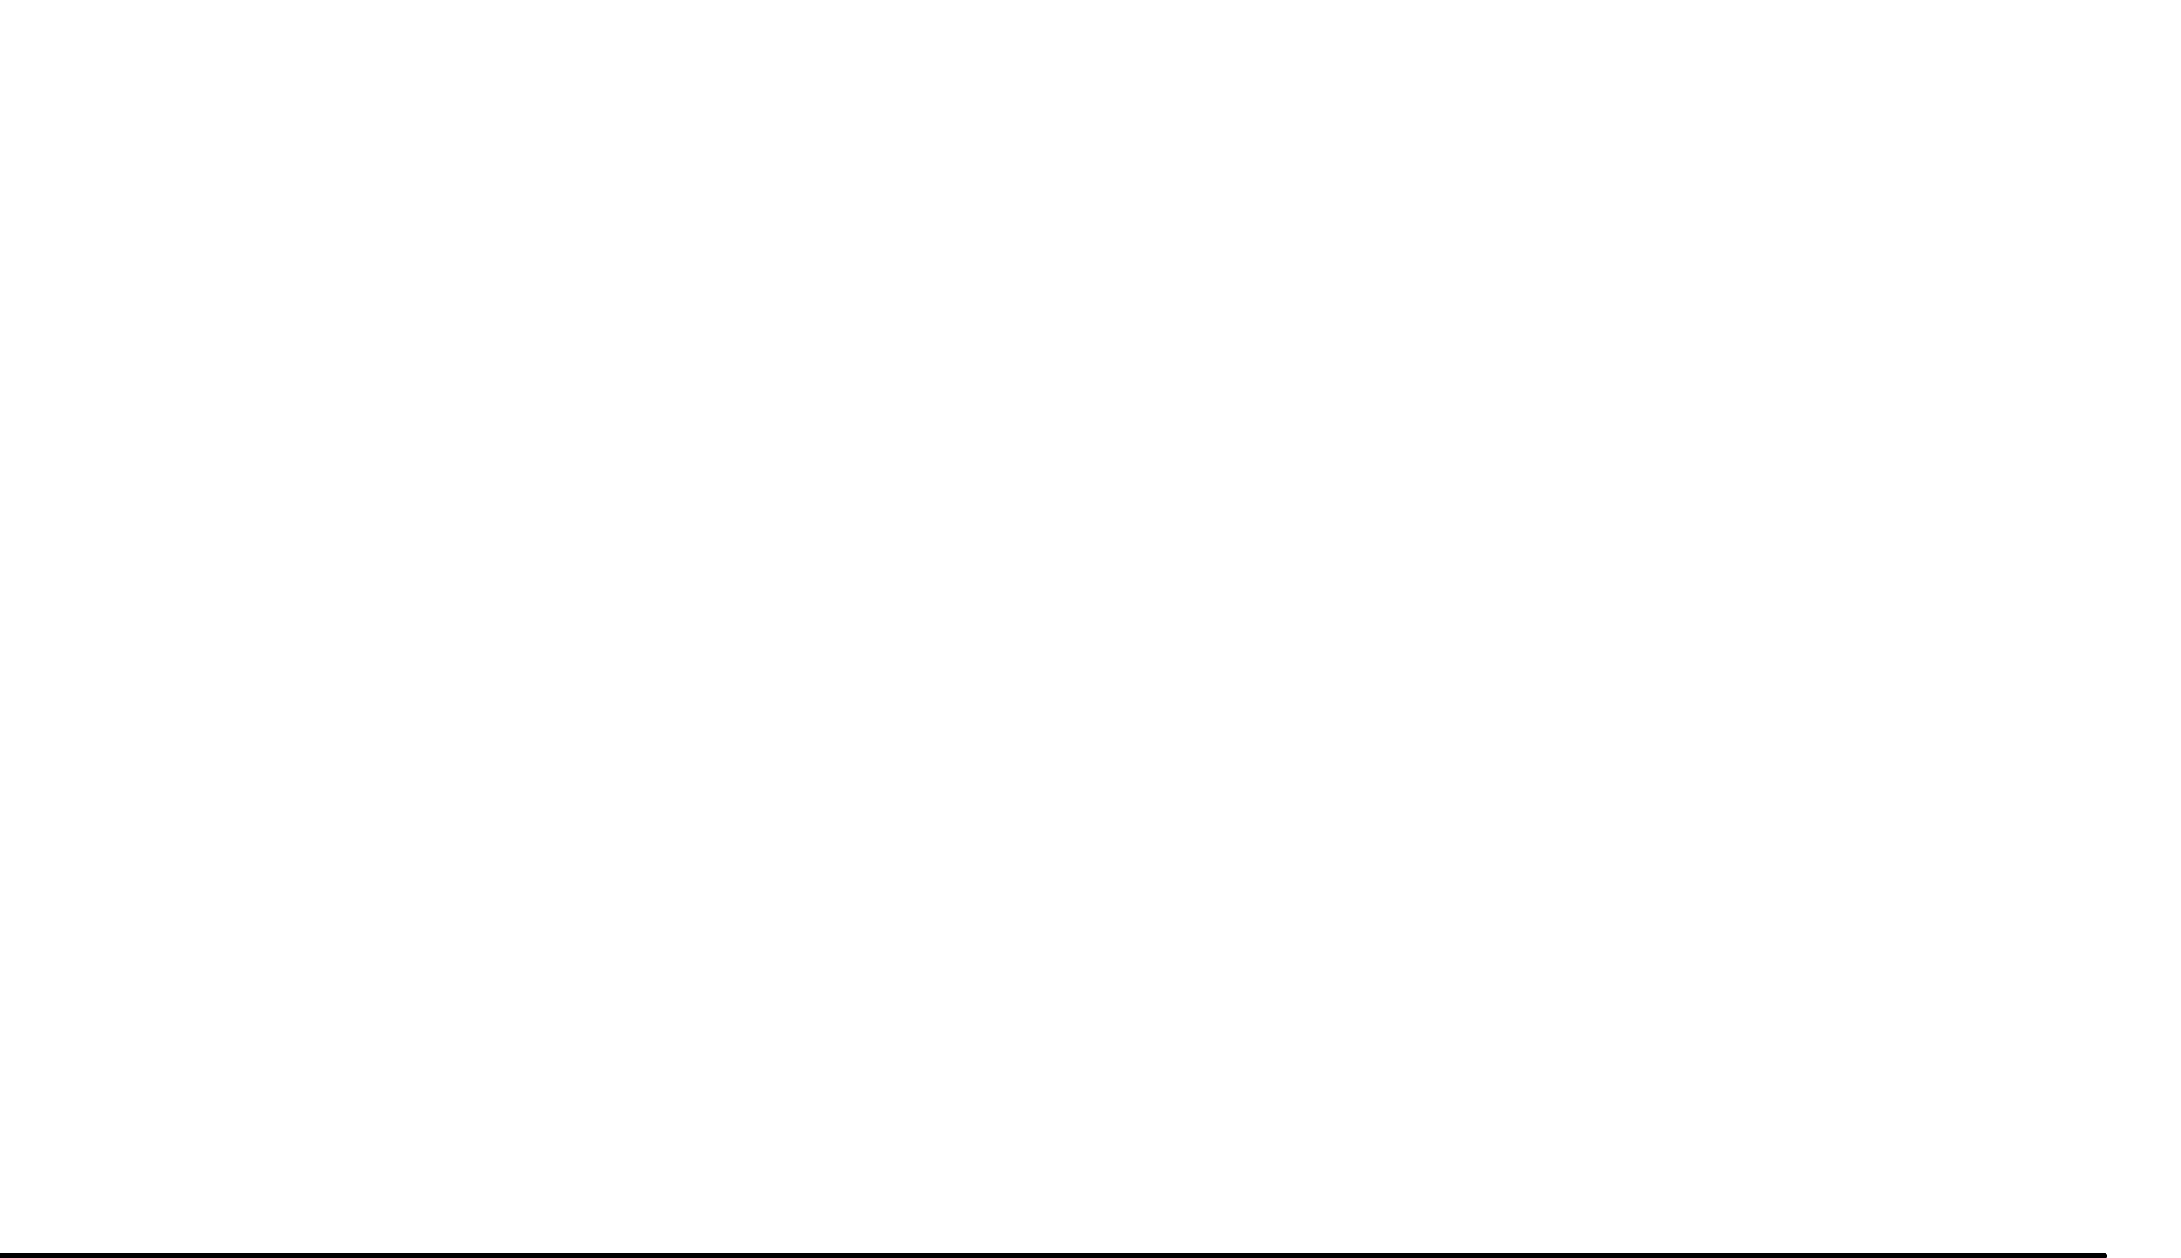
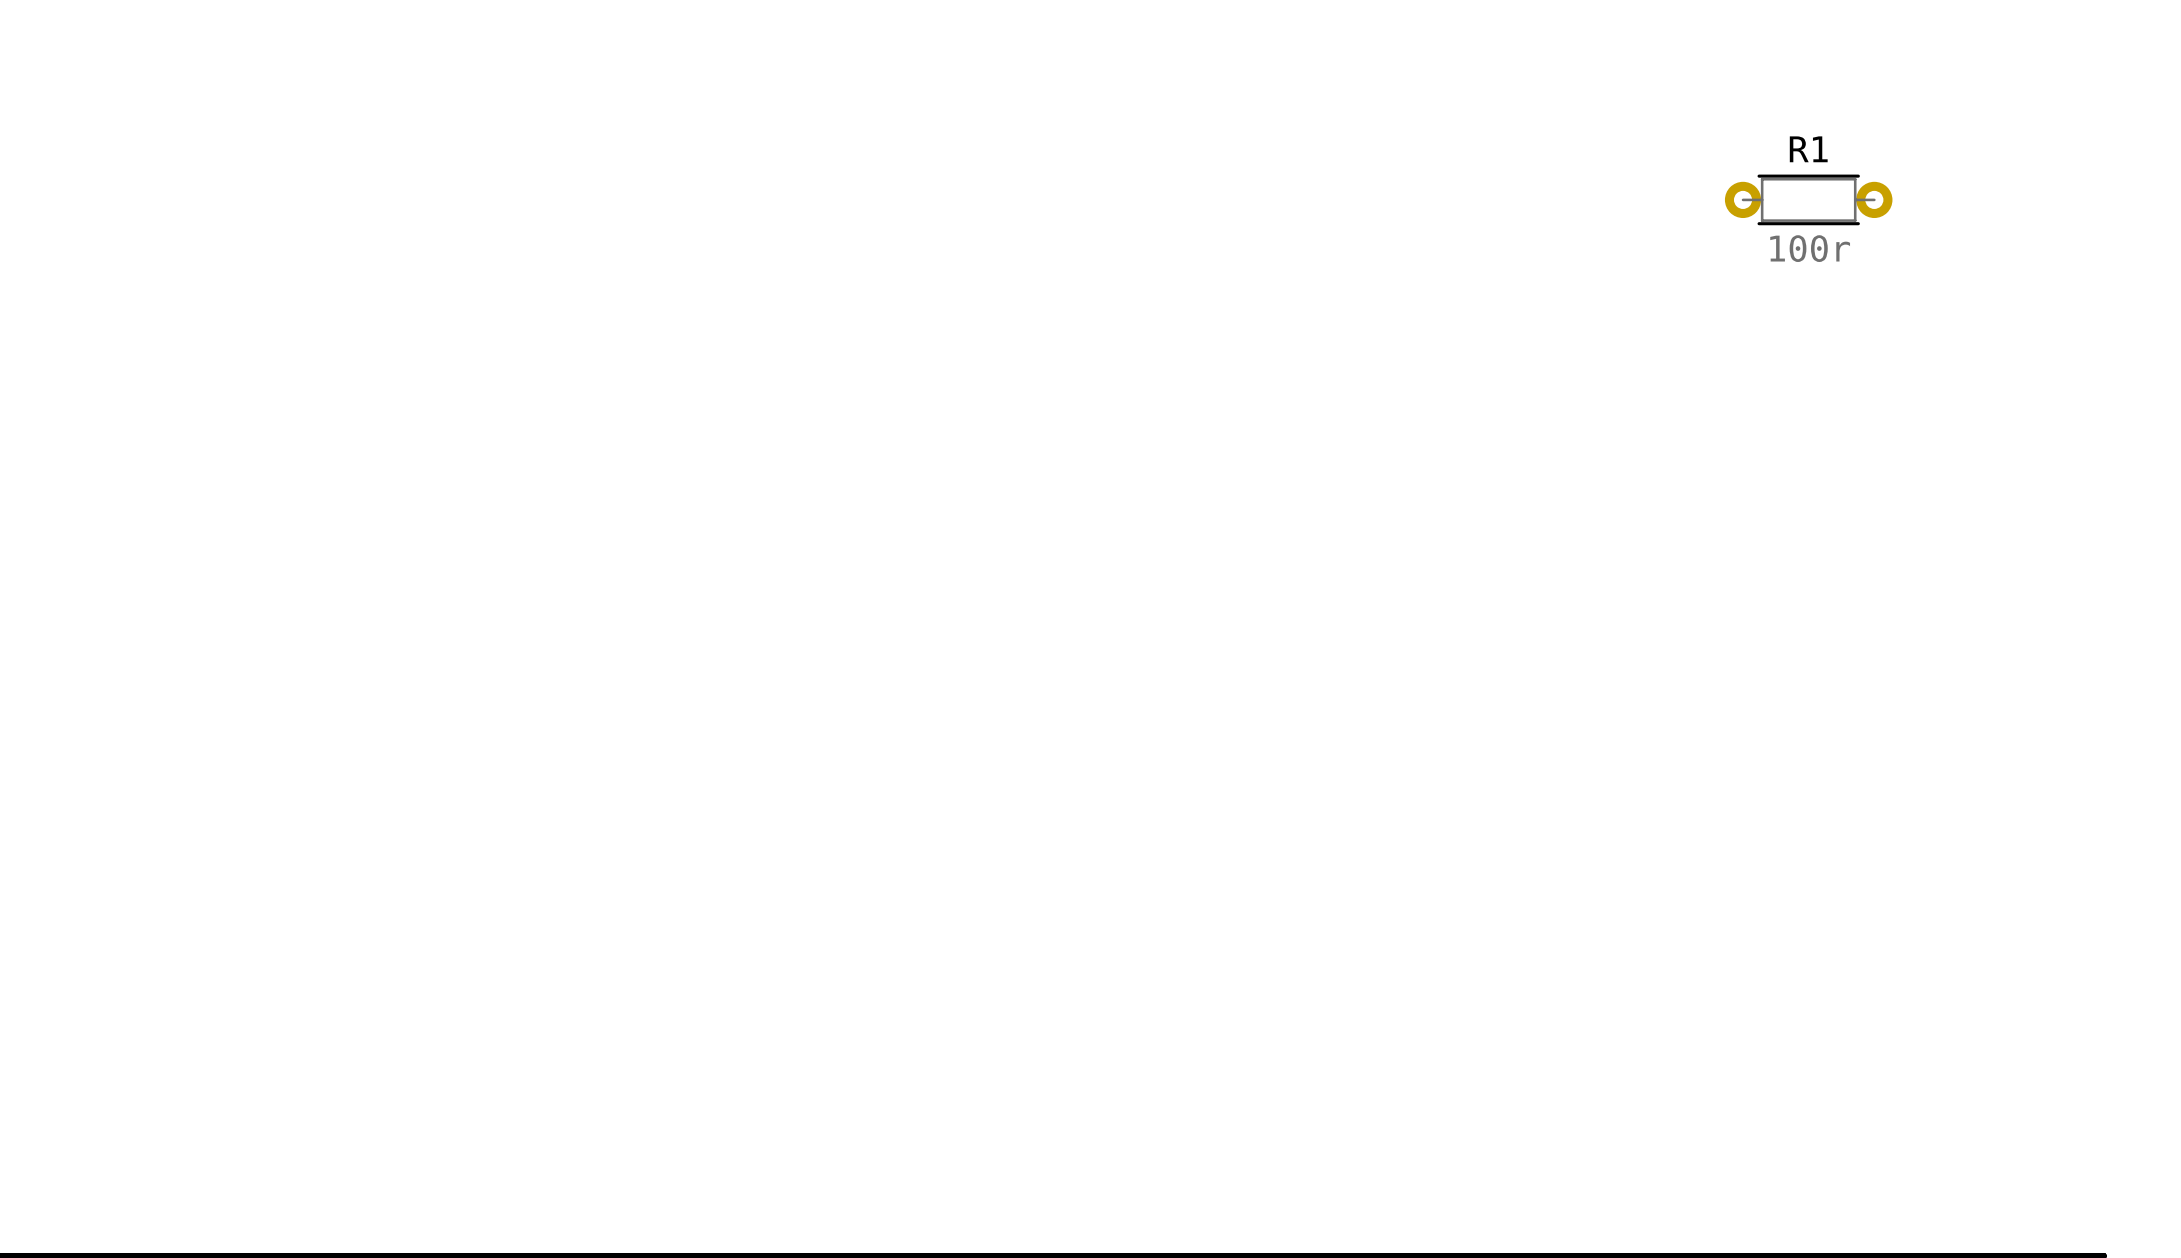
R1: none -> 100r (1808, 199)

